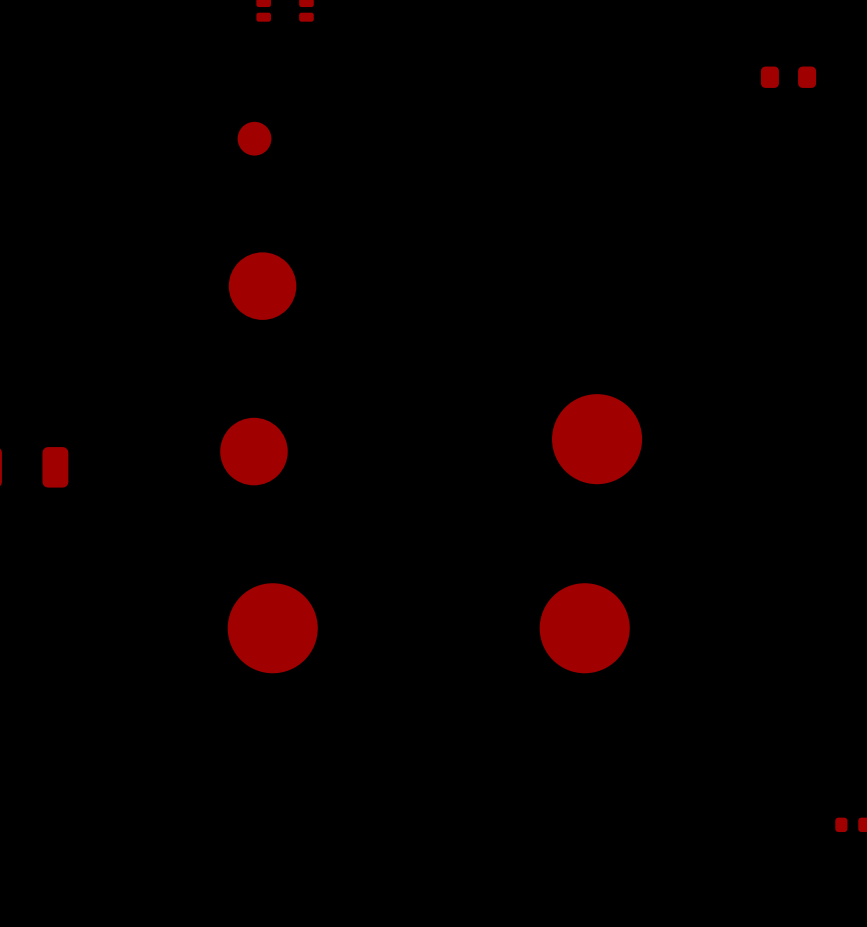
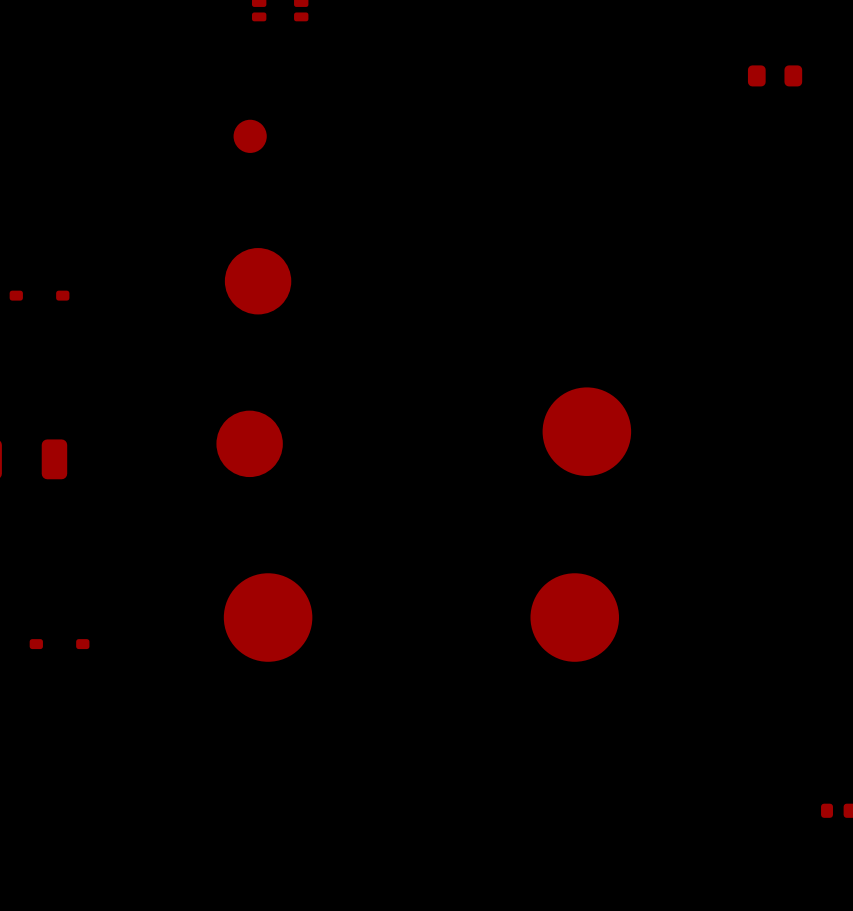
part: none -> (39, 295)
part: none -> (59, 644)

